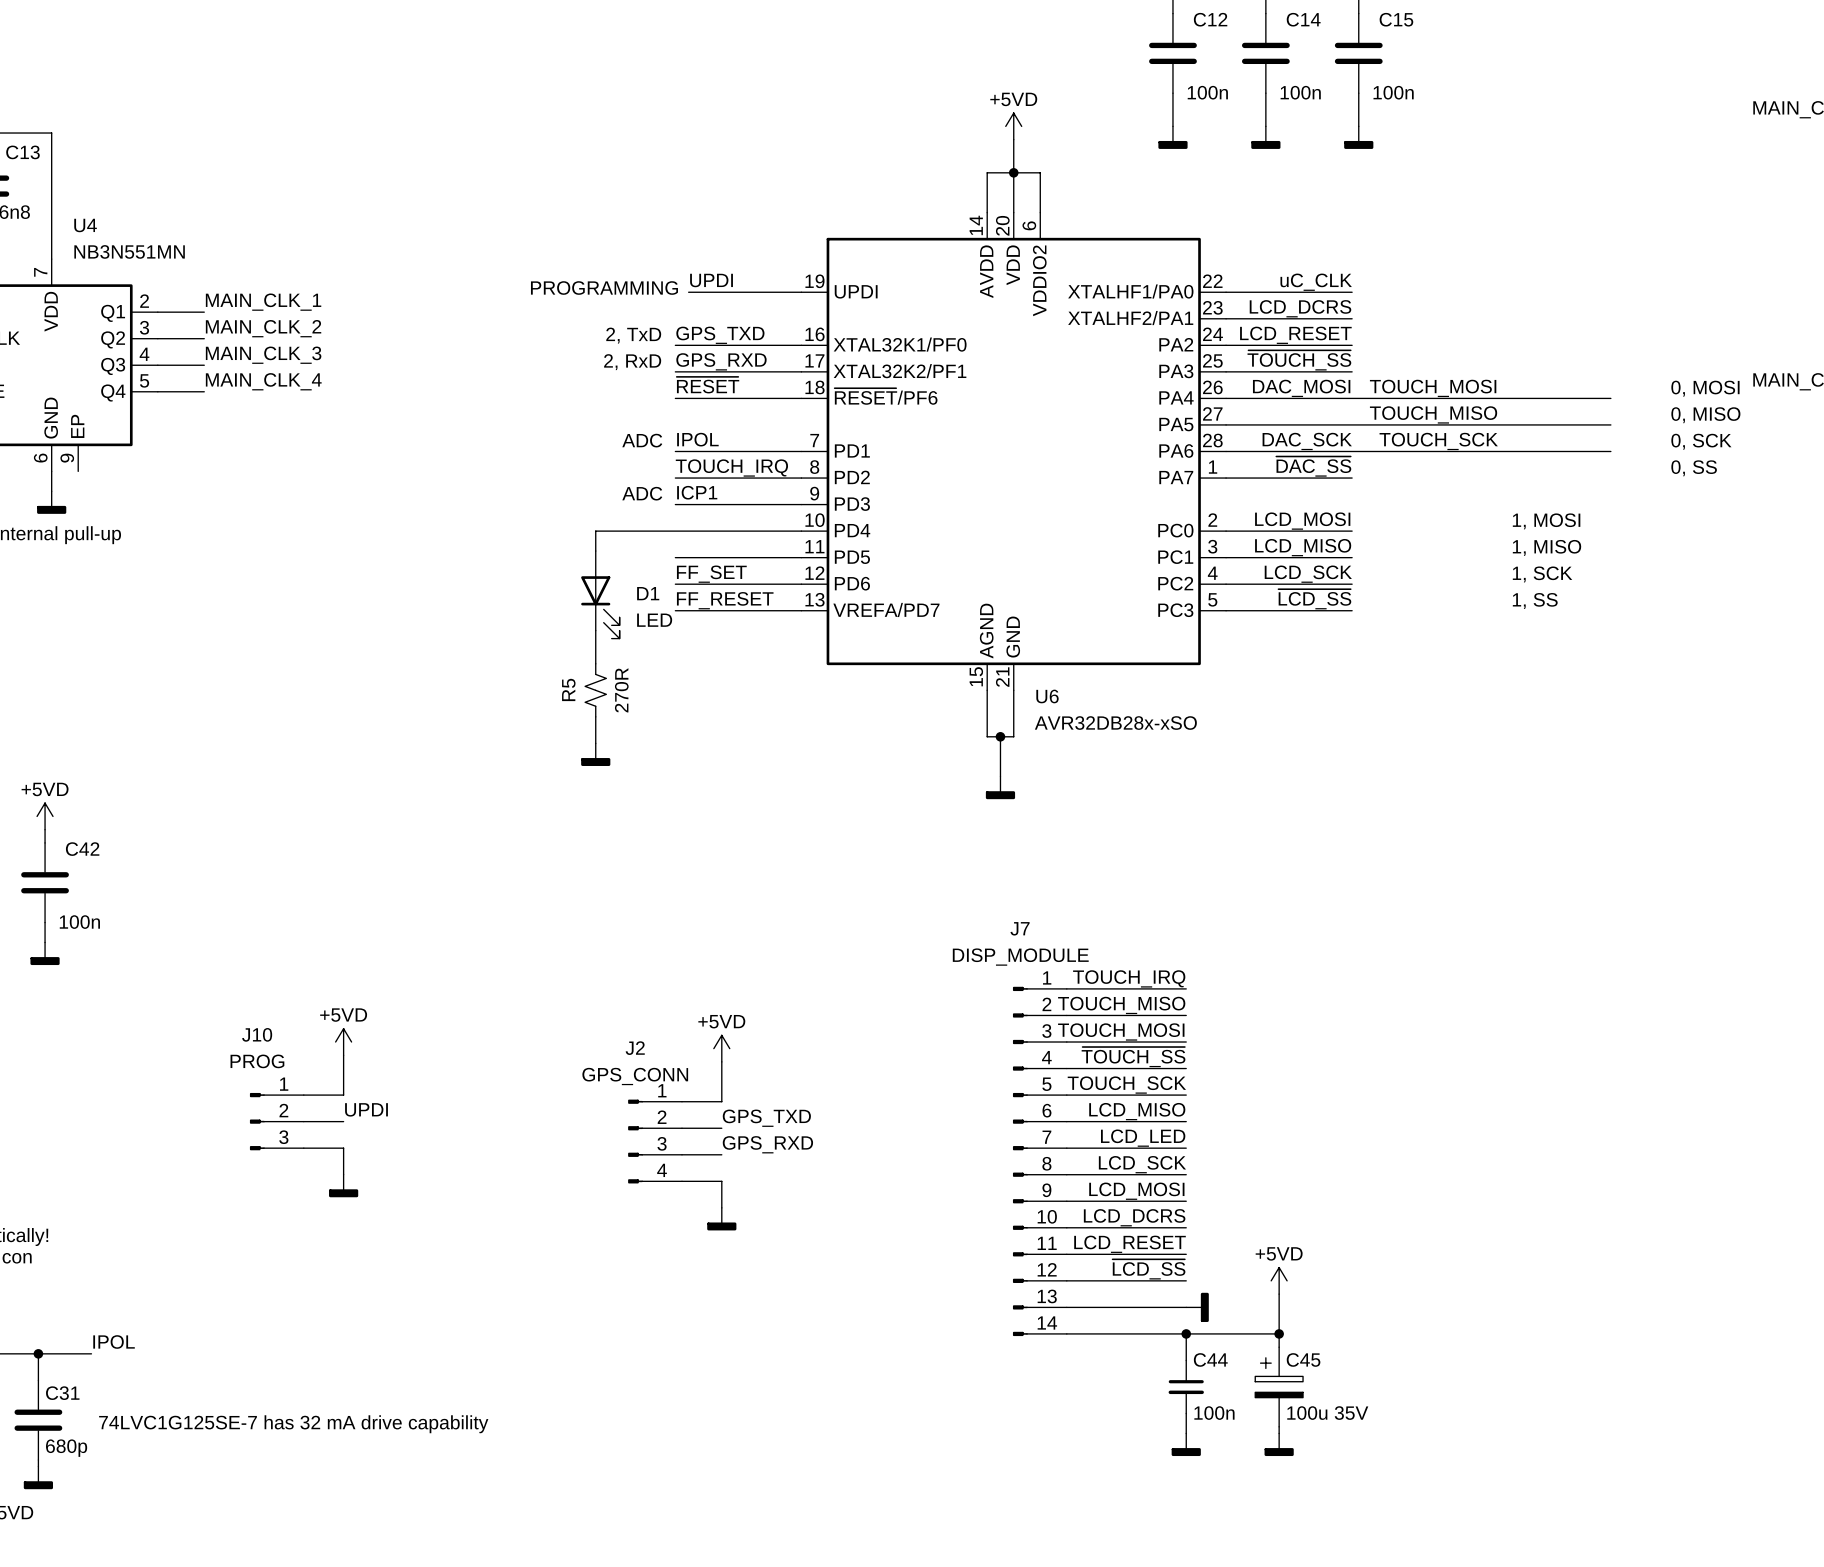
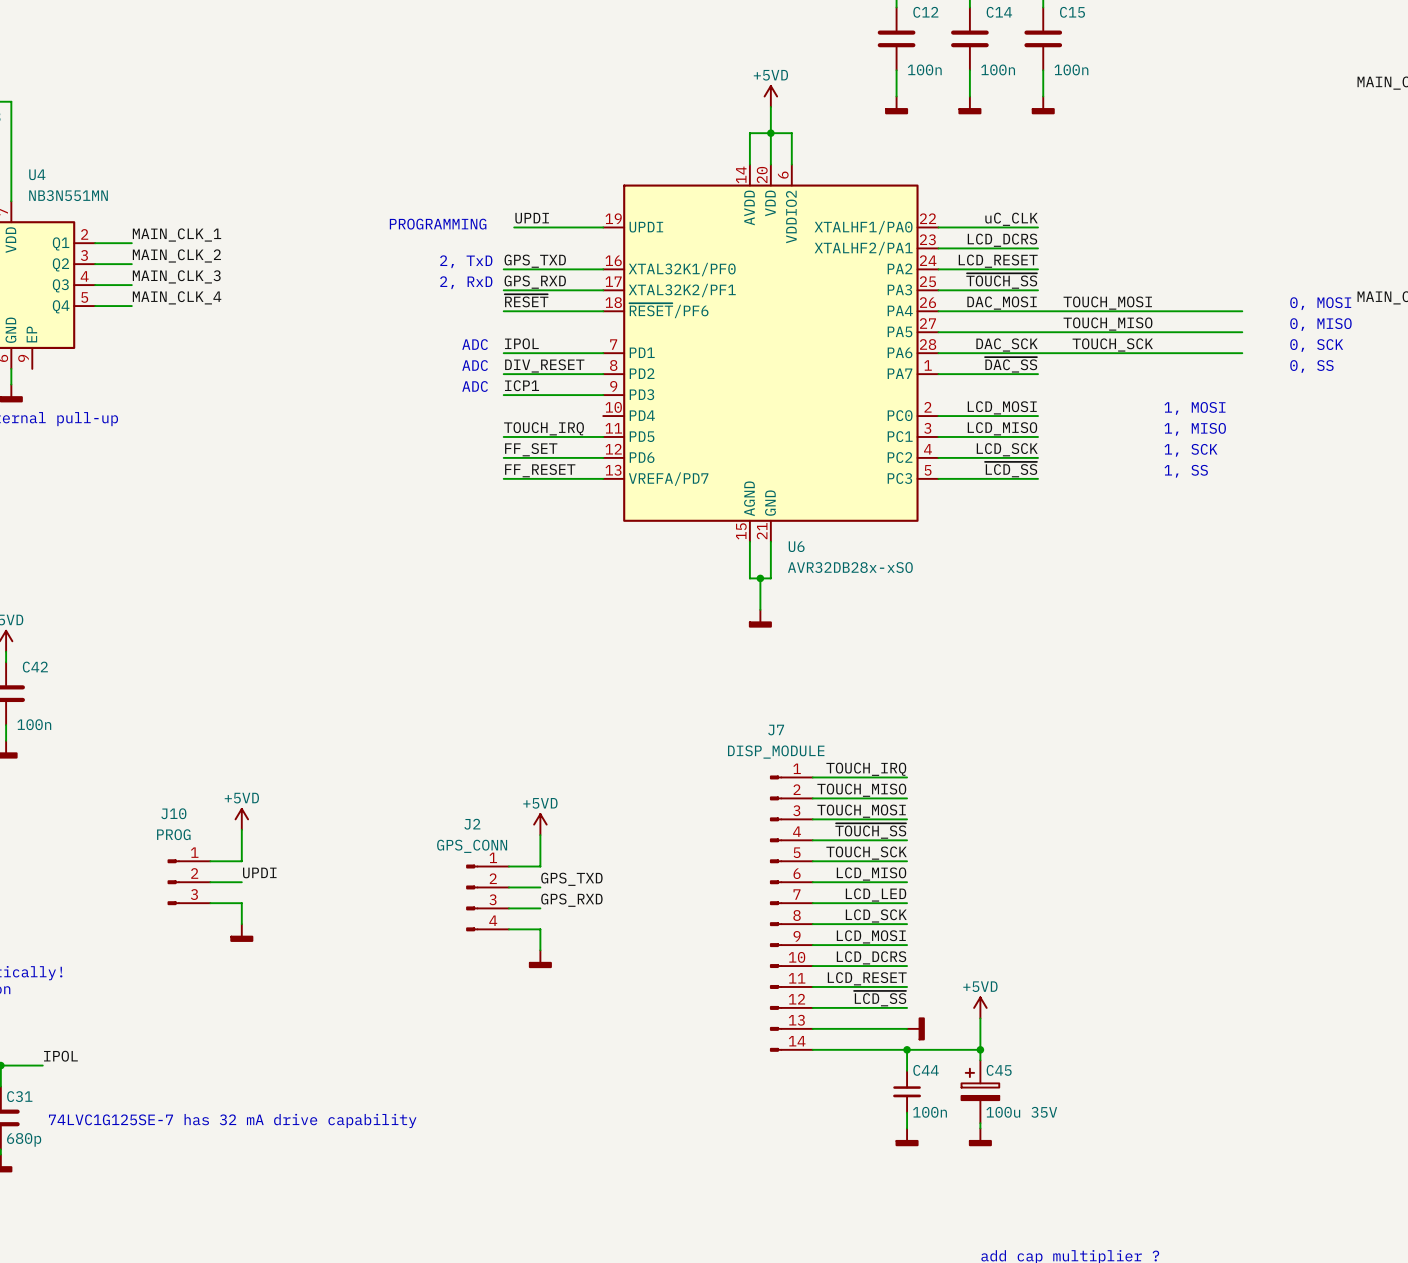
text: none -> ADC (475, 365)
label: TOUCH_IRQ (731, 468) -> DIV_RESET (544, 365)
wire: (801, 531) (595, 531) (595, 551) -> none
label: none -> TOUCH_IRQ (544, 428)
D1: LED (600, 594) -> none
wire: (595, 630) (595, 663) -> none
R5: 270R (595, 690) -> none
wire: (595, 716) (595, 743) -> none
power symbol: (595, 754) -> none

